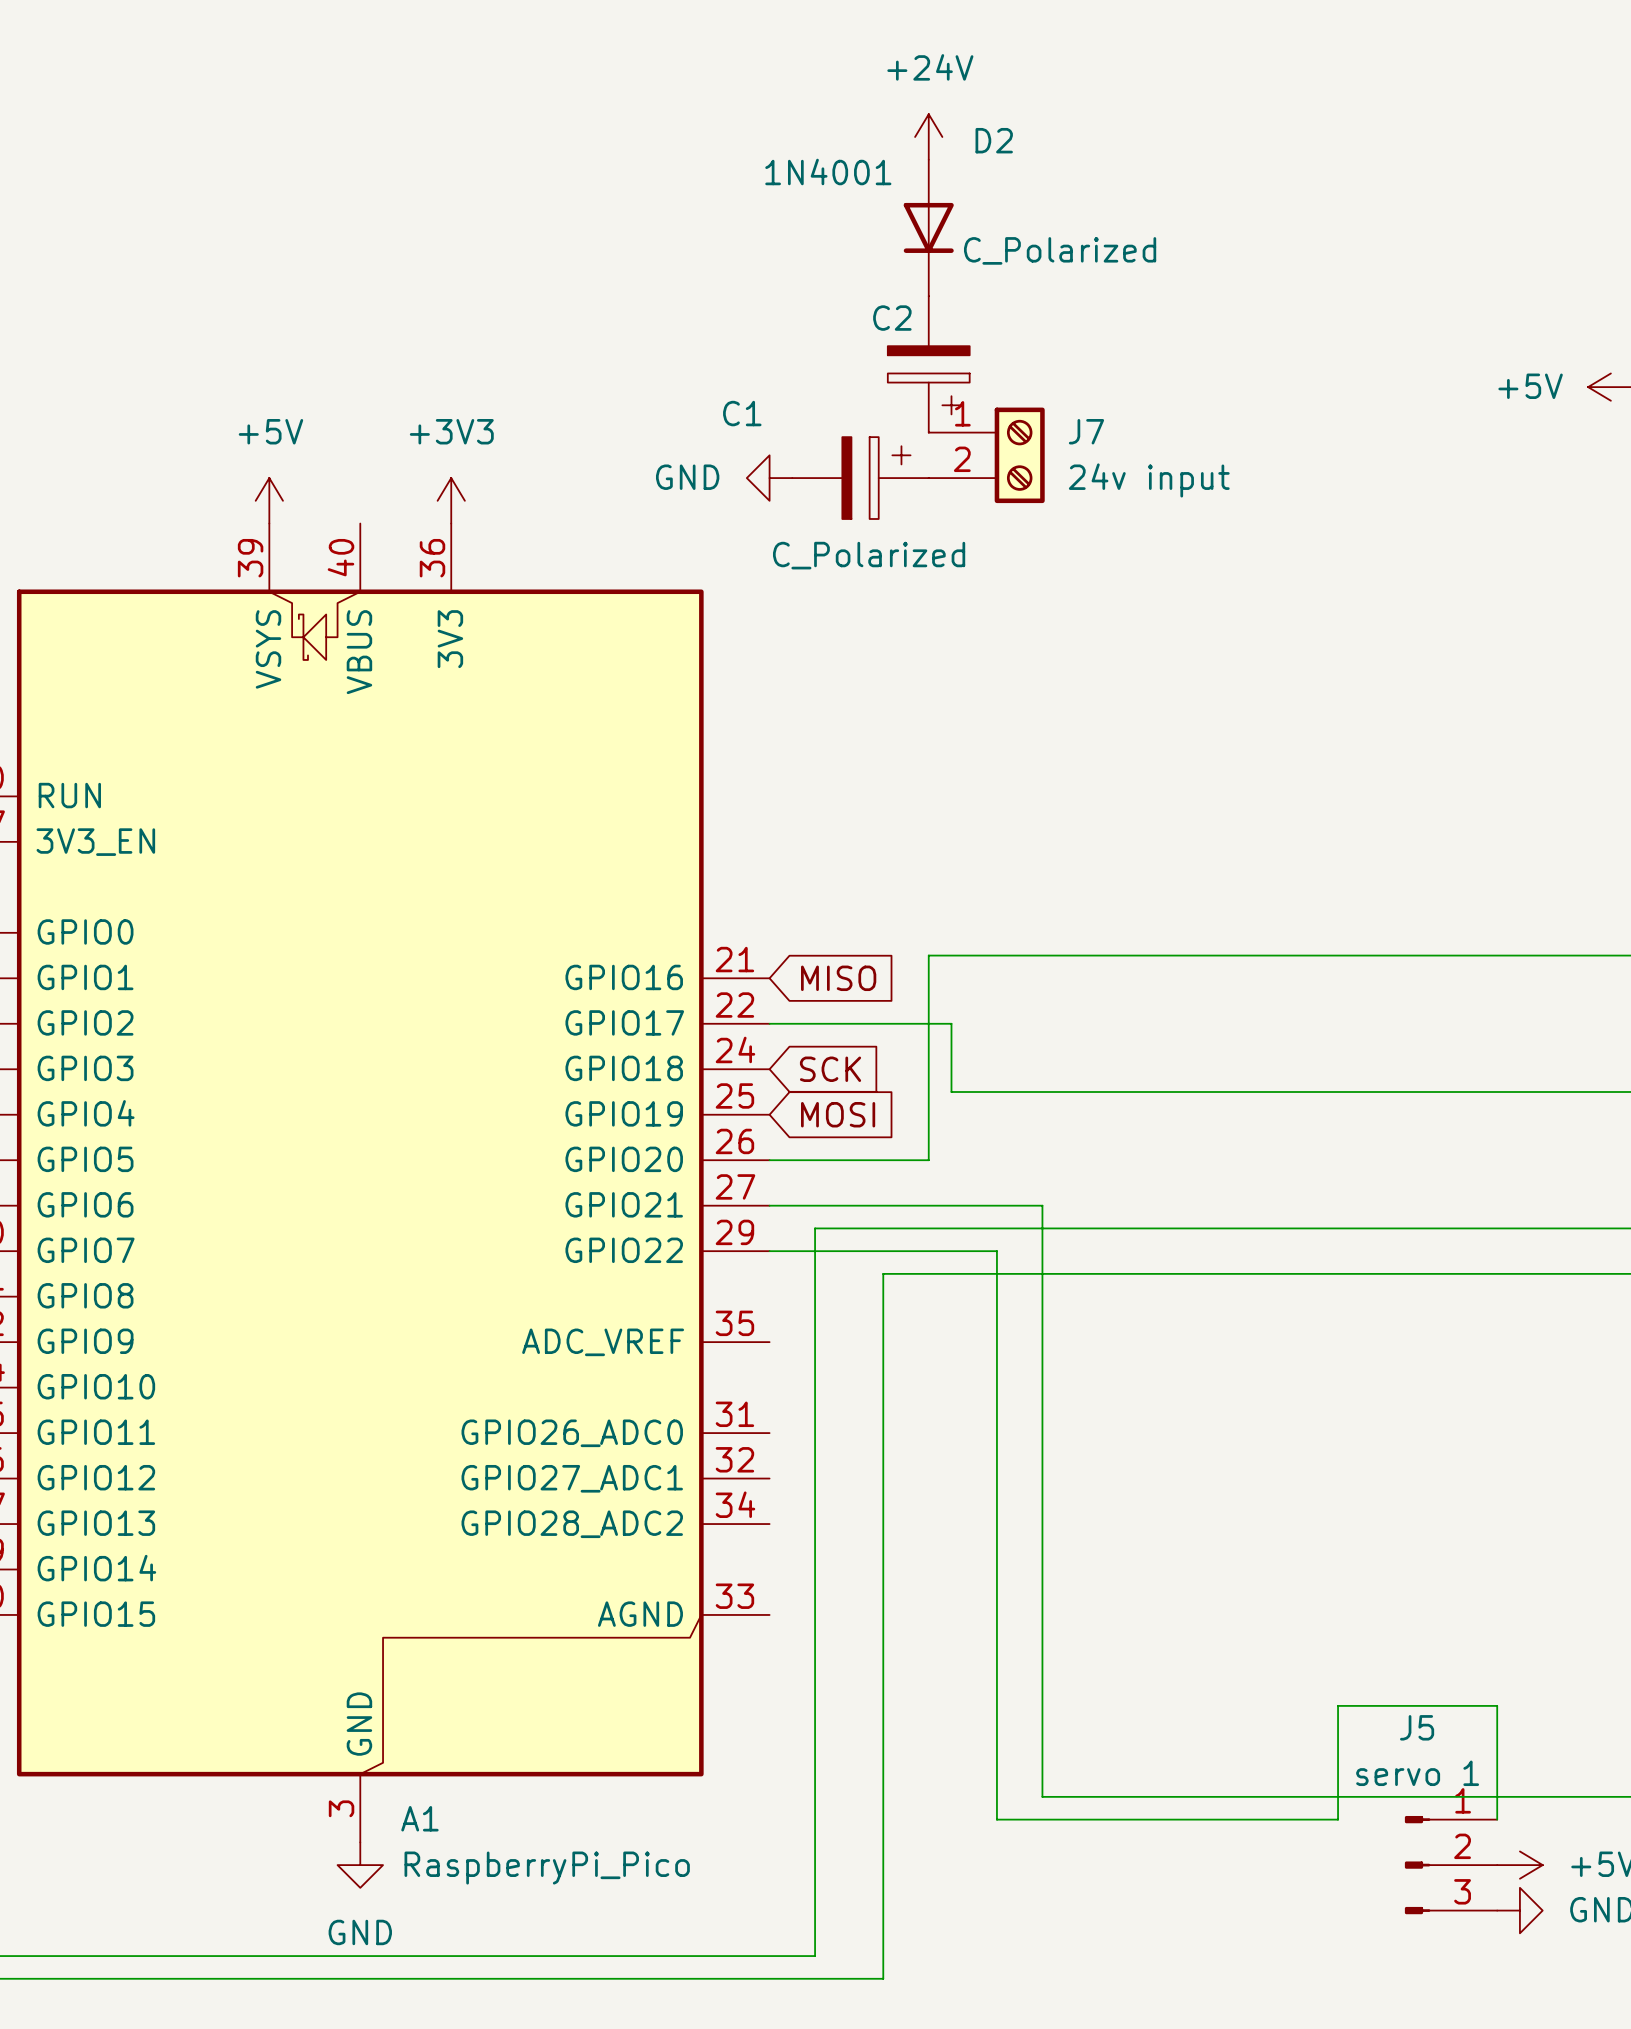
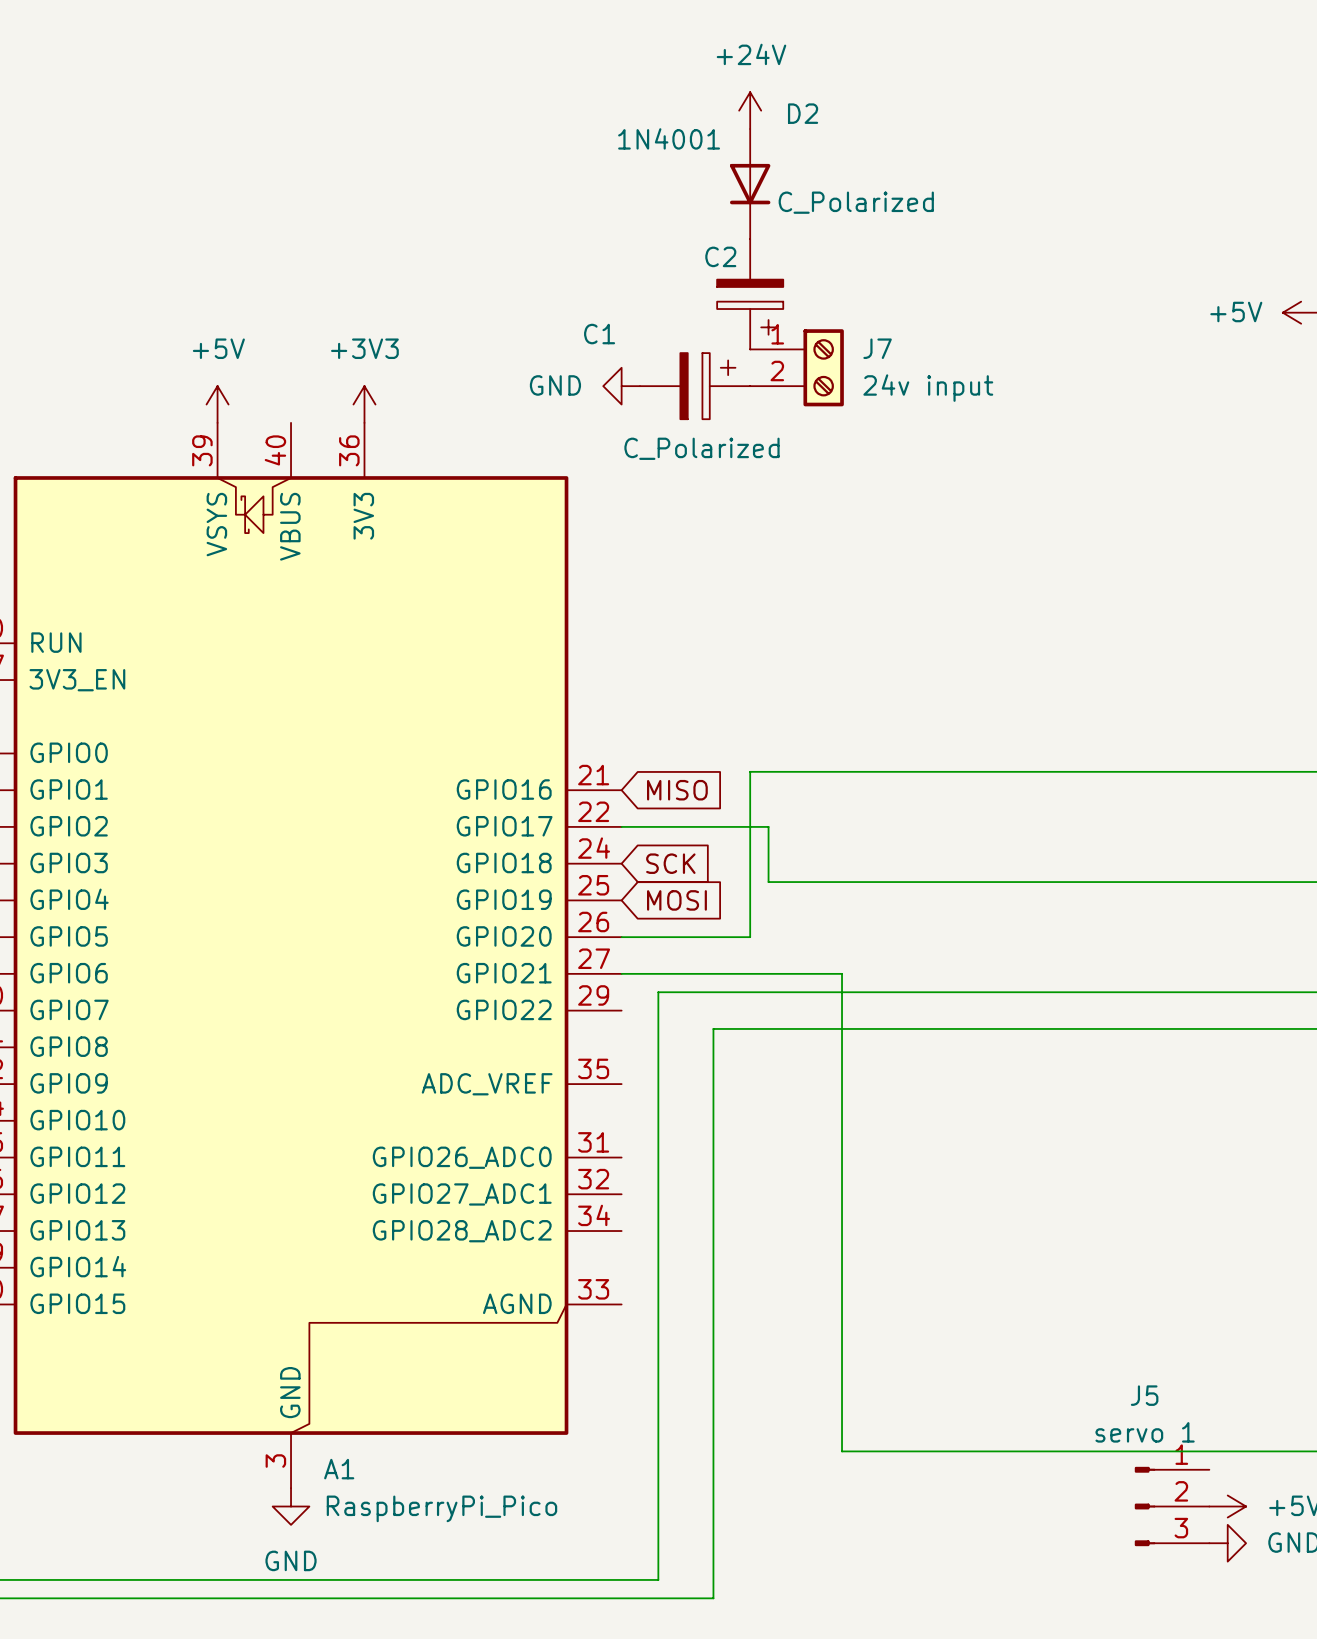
wire: (769, 1251) (996, 1251) (996, 1819) (1338, 1819) (1338, 1705) (1497, 1705) (1497, 1819) -> none

